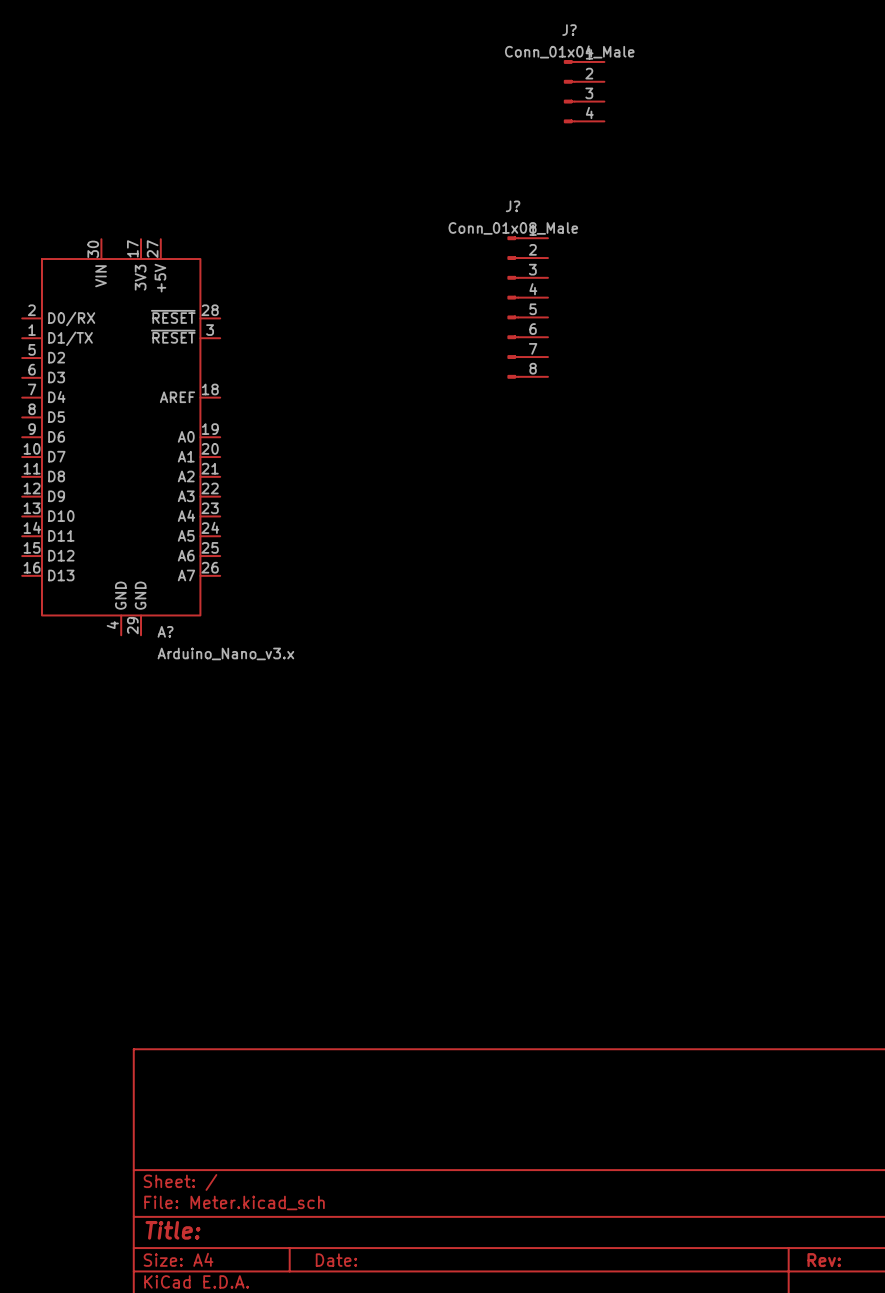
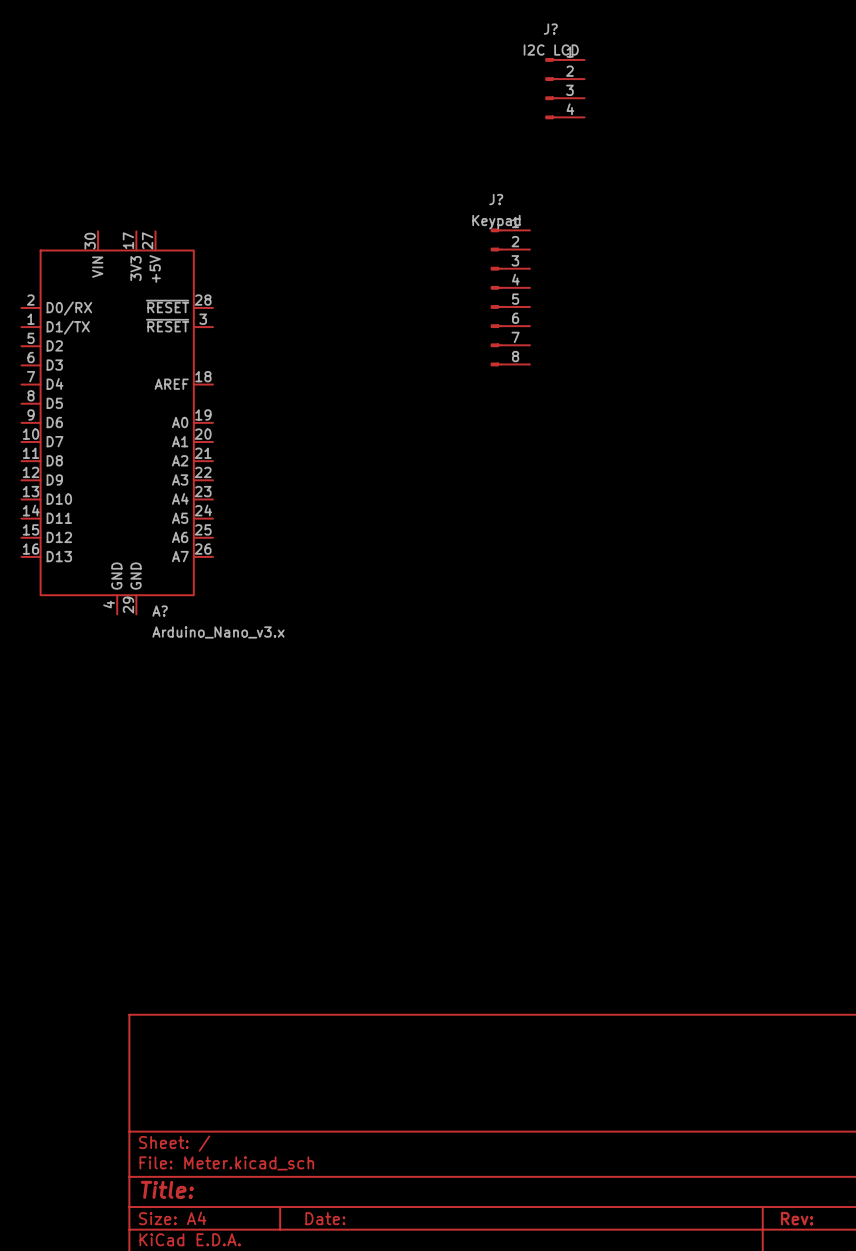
J? value: Conn_01x04_Male (569, 51) -> I2C LCD (551, 50)
J? value: Conn_01x08_Male (513, 228) -> Keypad (496, 222)

